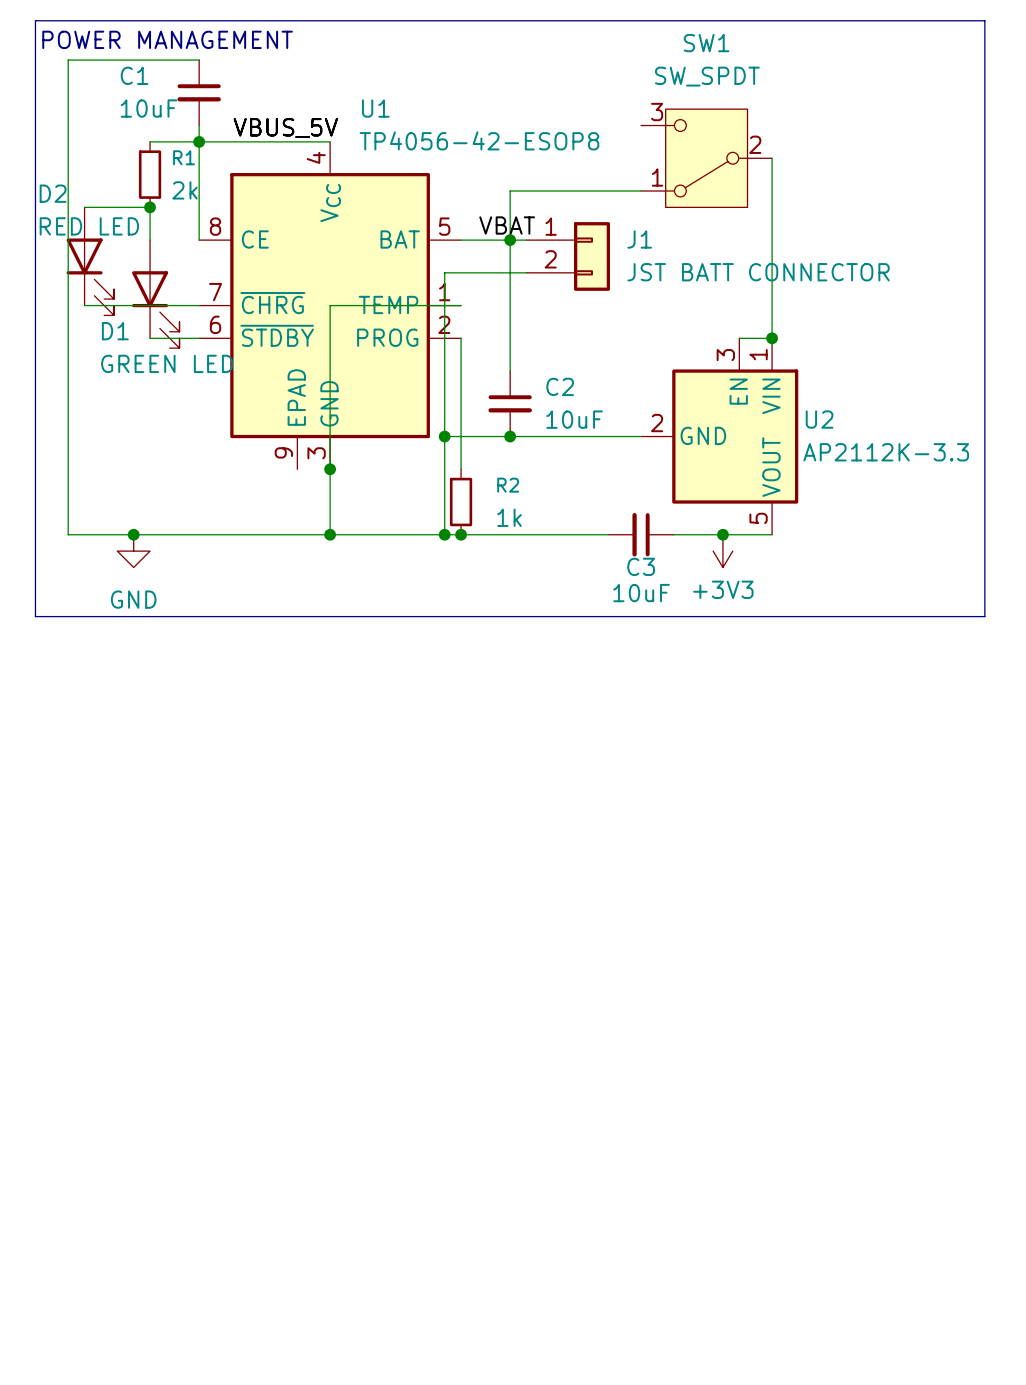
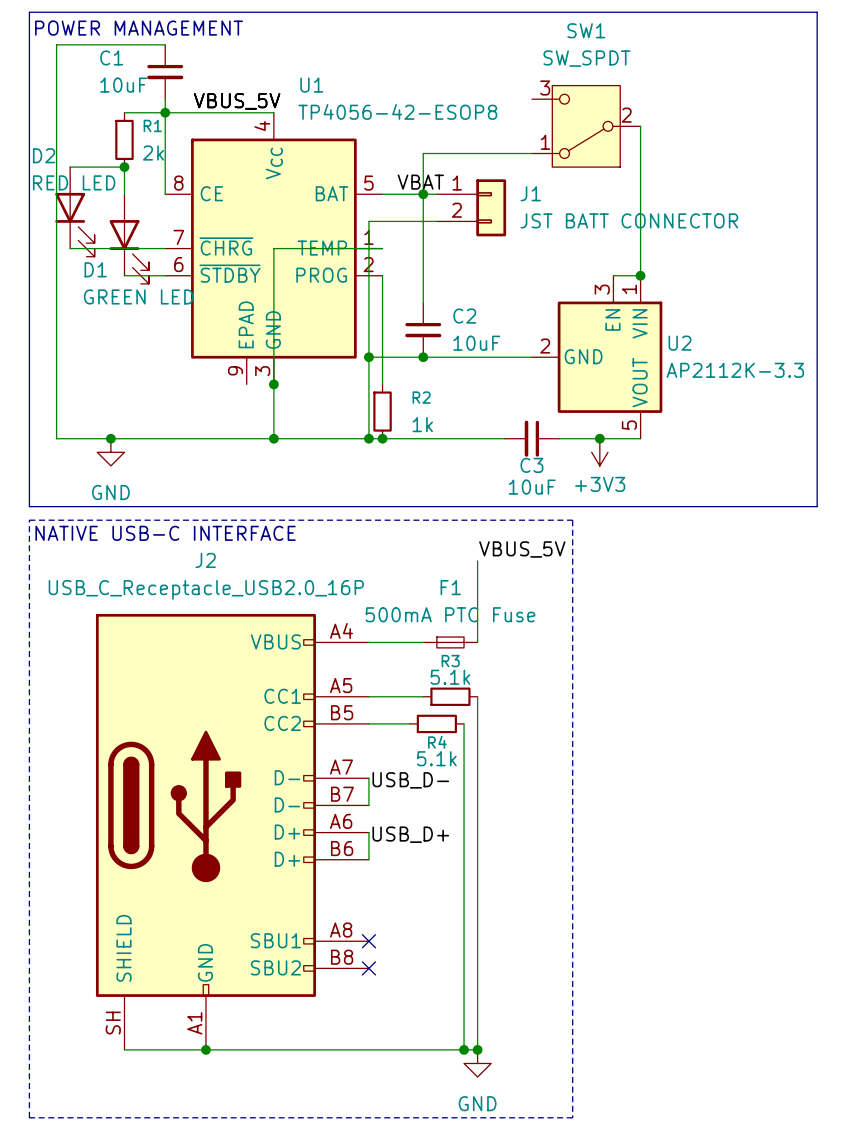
line: none -> (29, 520) (572, 520) (572, 1117) (29, 1117) (29, 520)
text: none -> NATIVE USB-C INTERFACE (165, 533)
label: none -> VBUS_5V (522, 549)
wire: none -> (477, 560) (477, 642)
wire: none -> (368, 642) (423, 642)
F1: none -> 500mA PTC Fuse (450, 642)
wire: none -> (368, 696) (423, 696)
R3: none -> 5.1k (450, 696)
wire: none -> (477, 696) (477, 1049) (124, 1049)
wire: none -> (368, 723) (409, 723)
R4: none -> 5.1k (436, 723)
wire: none -> (464, 723) (464, 1049)
wire: none -> (368, 778) (368, 805)
label: none -> USB_D- (410, 780)
J2: none -> USB_C_Receptacle_USB2.0_16P (232, 831)
wire: none -> (368, 832) (368, 859)
label: none -> USB_D+ (410, 834)
no-connect mark: none -> (368, 941)
no-connect mark: none -> (368, 968)
junction: none -> (205, 1049)
junction: none -> (464, 1049)
junction: none -> (477, 1049)
power symbol: none -> GND (477, 1063)

